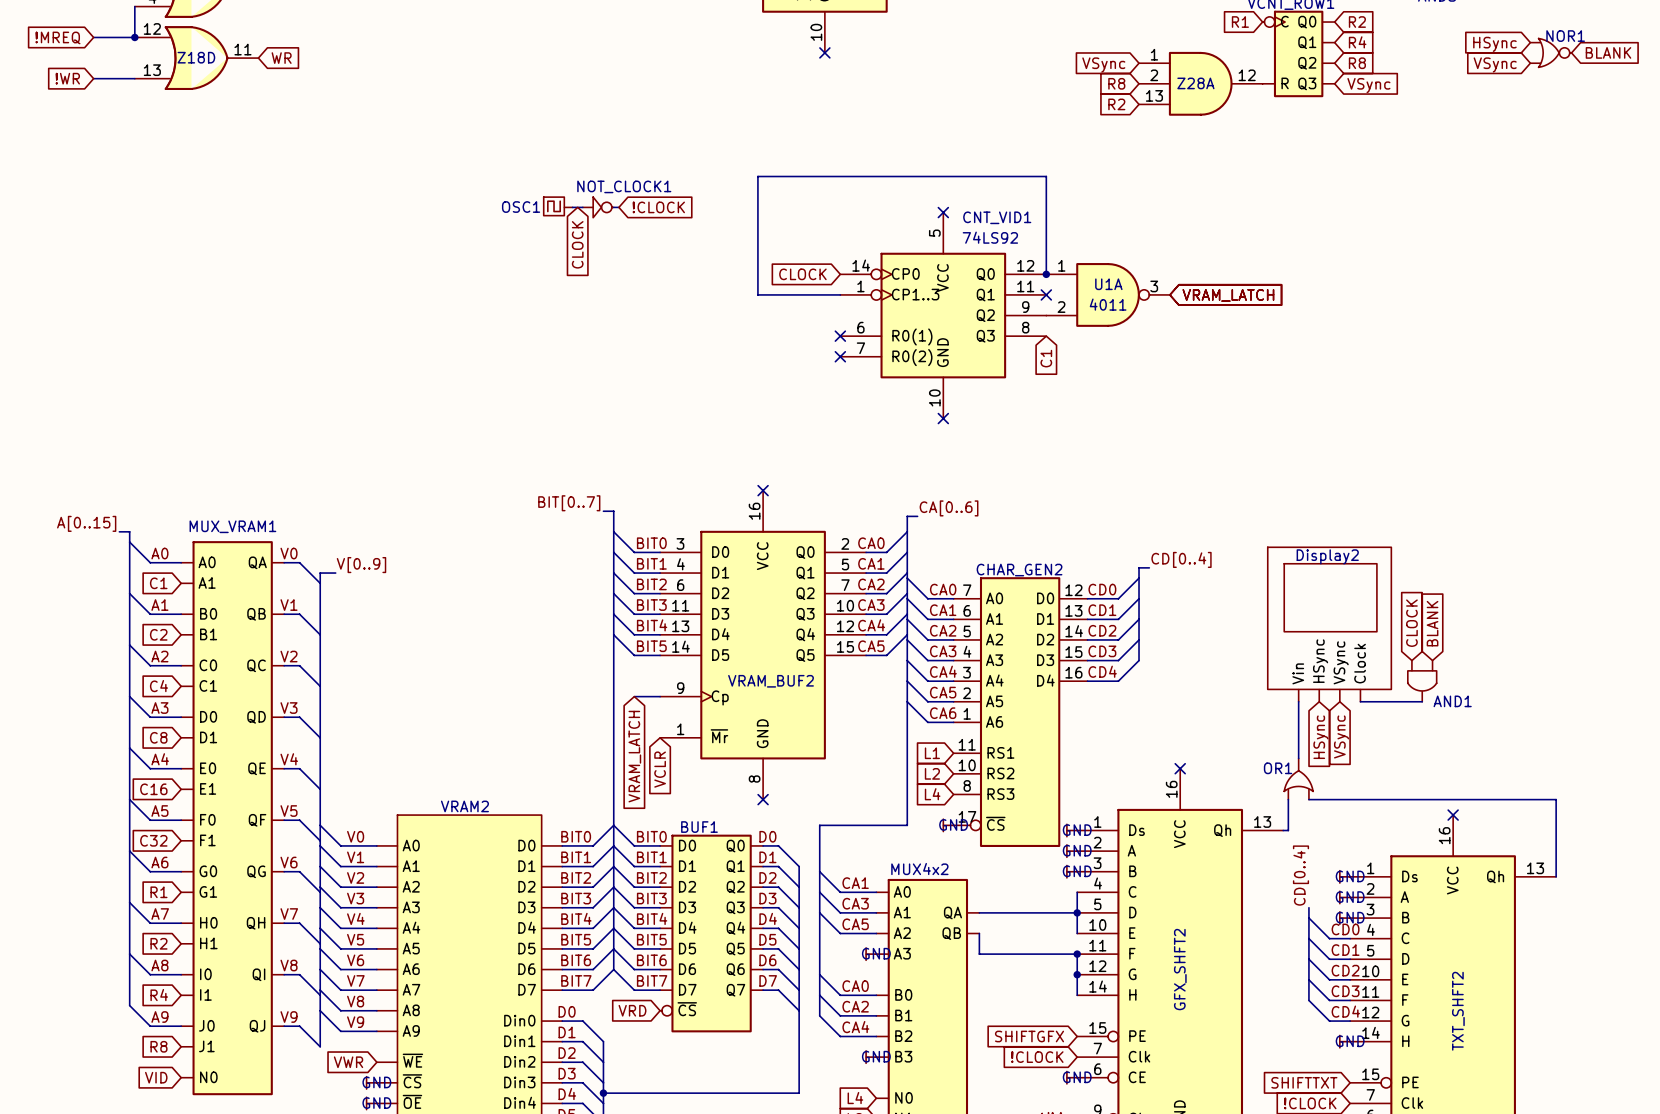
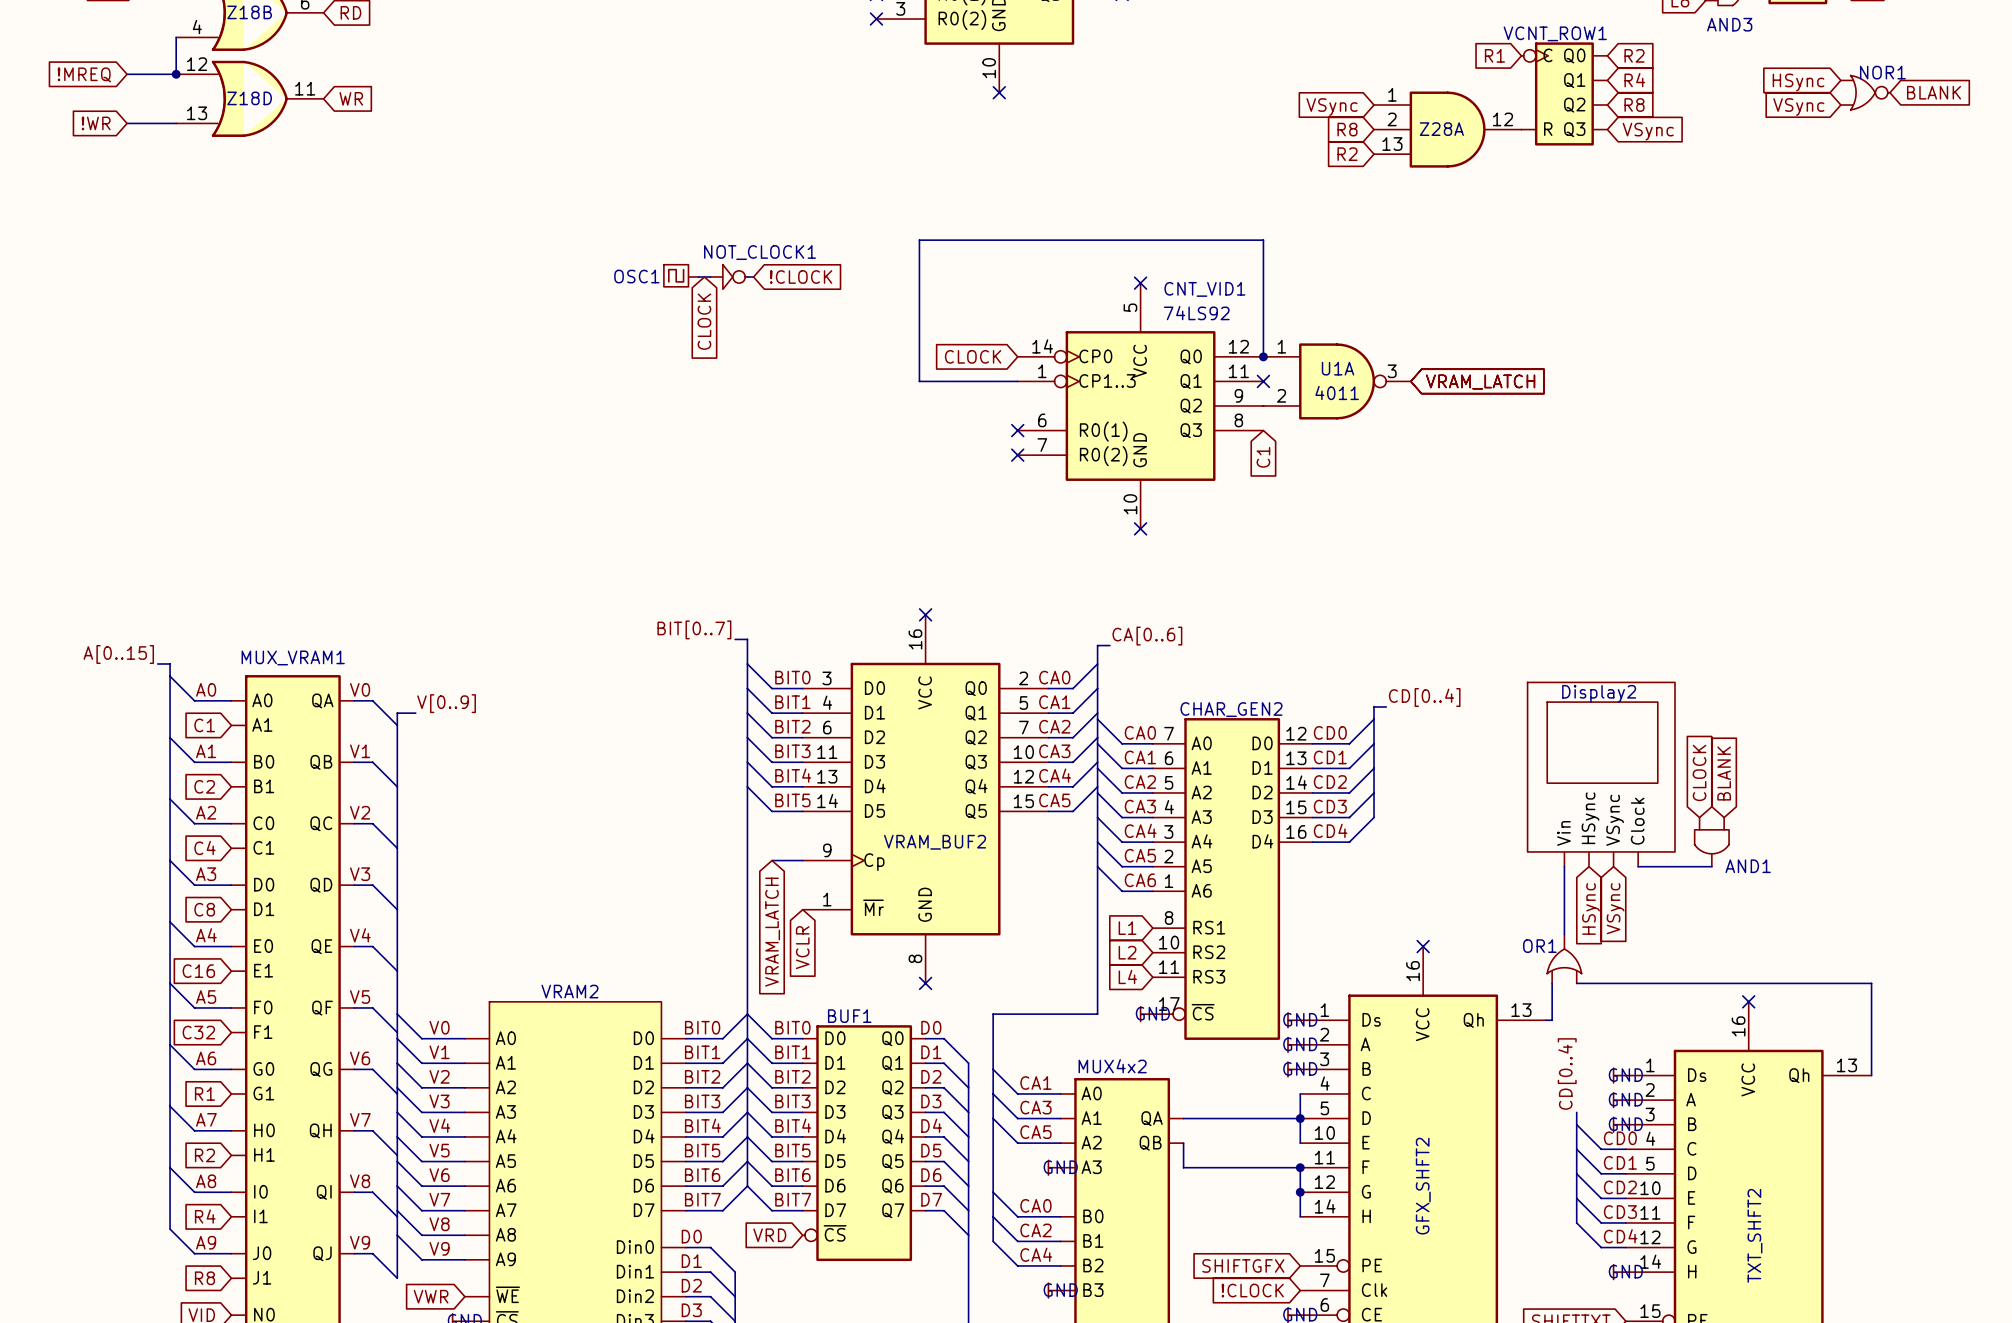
CHAR_GEN2 pin number: 11 (967, 744) -> 8 (1169, 917)
CHAR_GEN2 pin number: 8 (967, 785) -> 11 (1169, 967)

